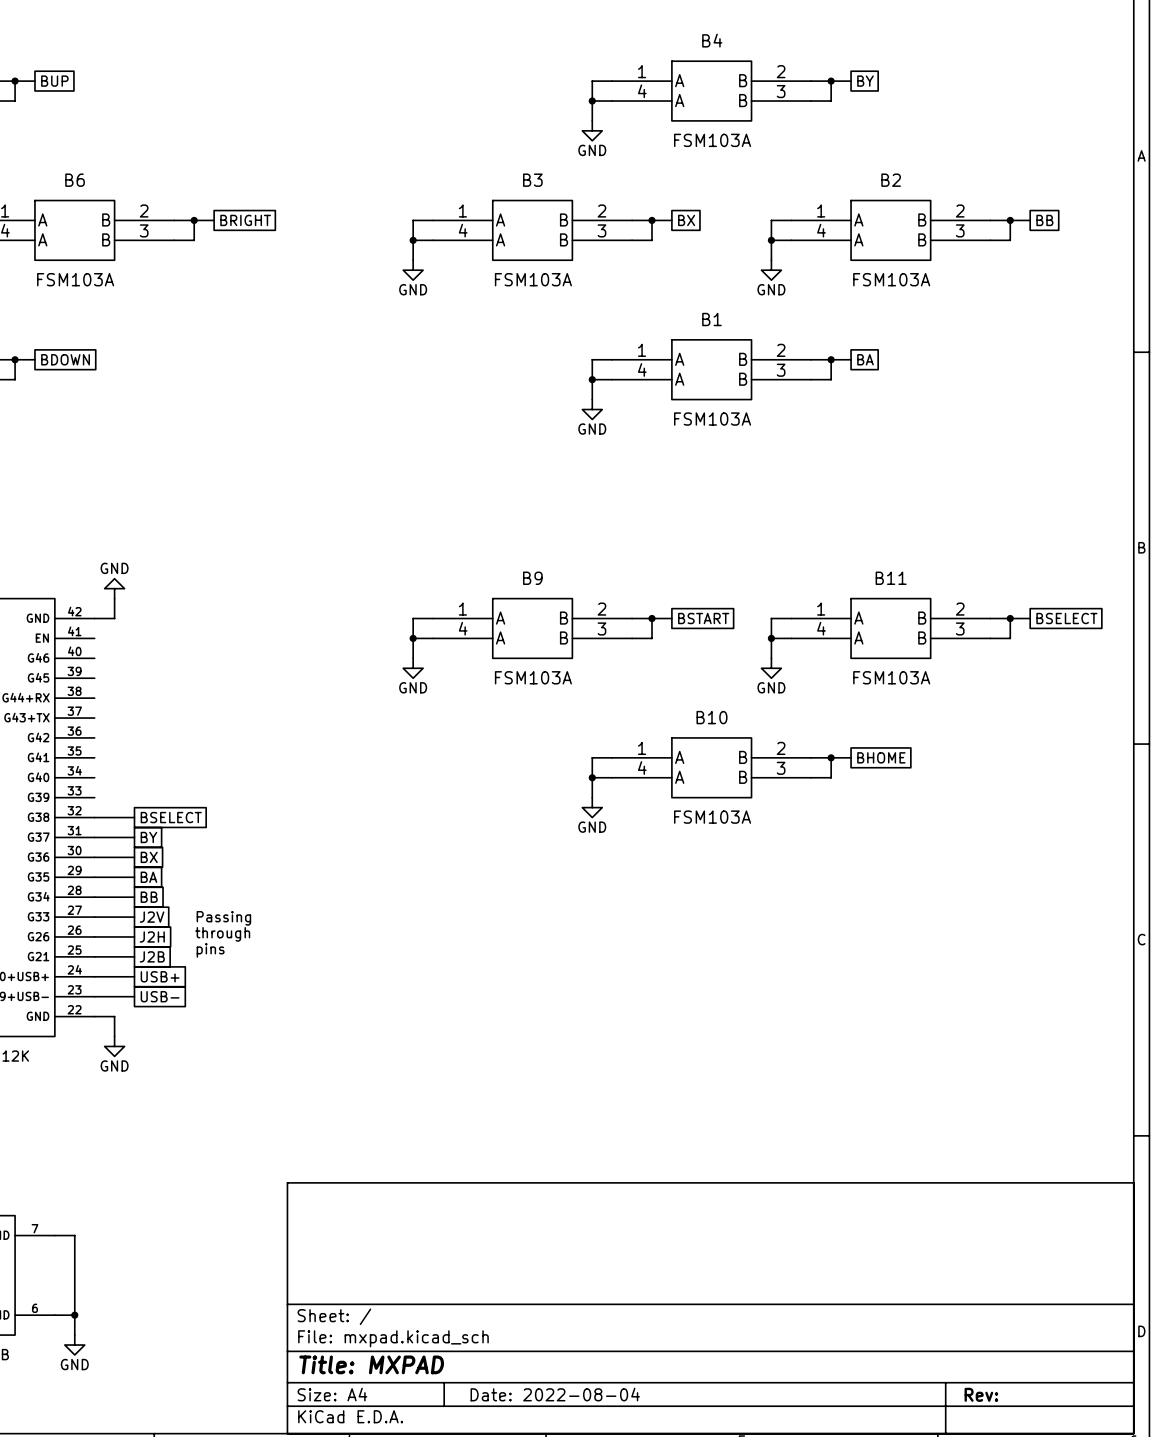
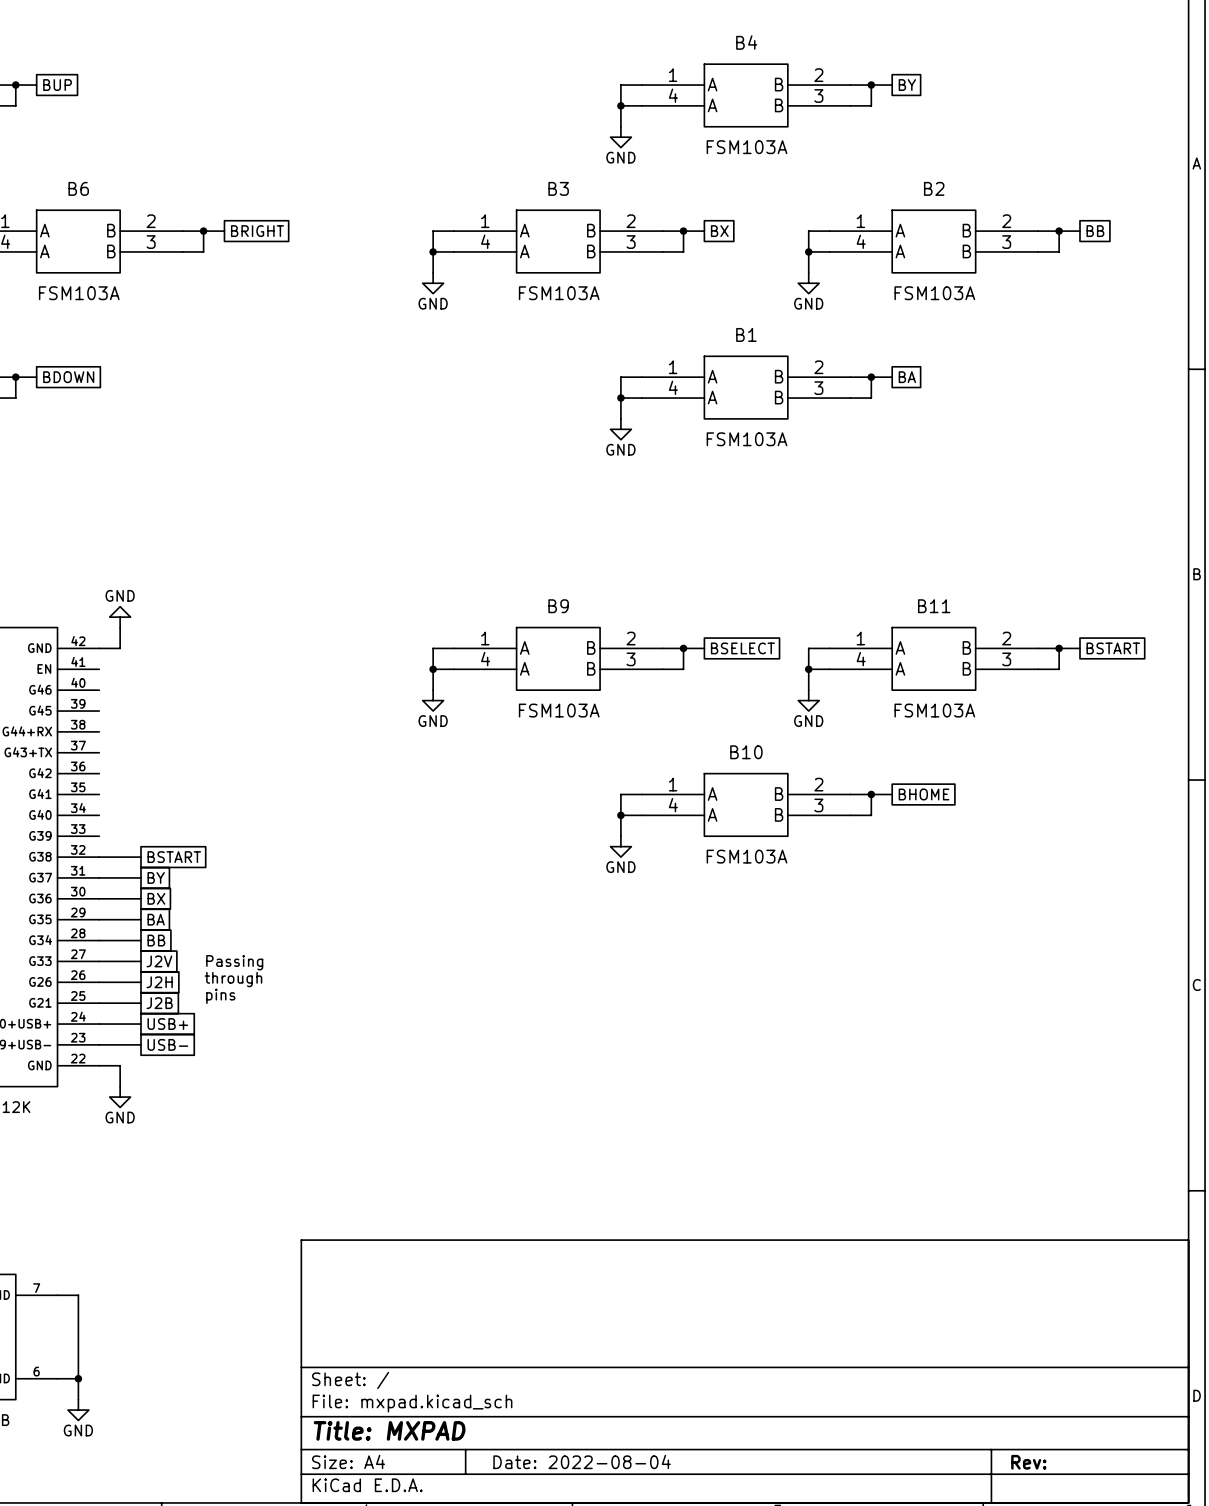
global label: BSTART (703, 618) -> BSELECT (742, 648)
global label: BSELECT (1066, 618) -> BSTART (1113, 648)
global label: BSELECT (171, 817) -> BSTART (174, 857)

